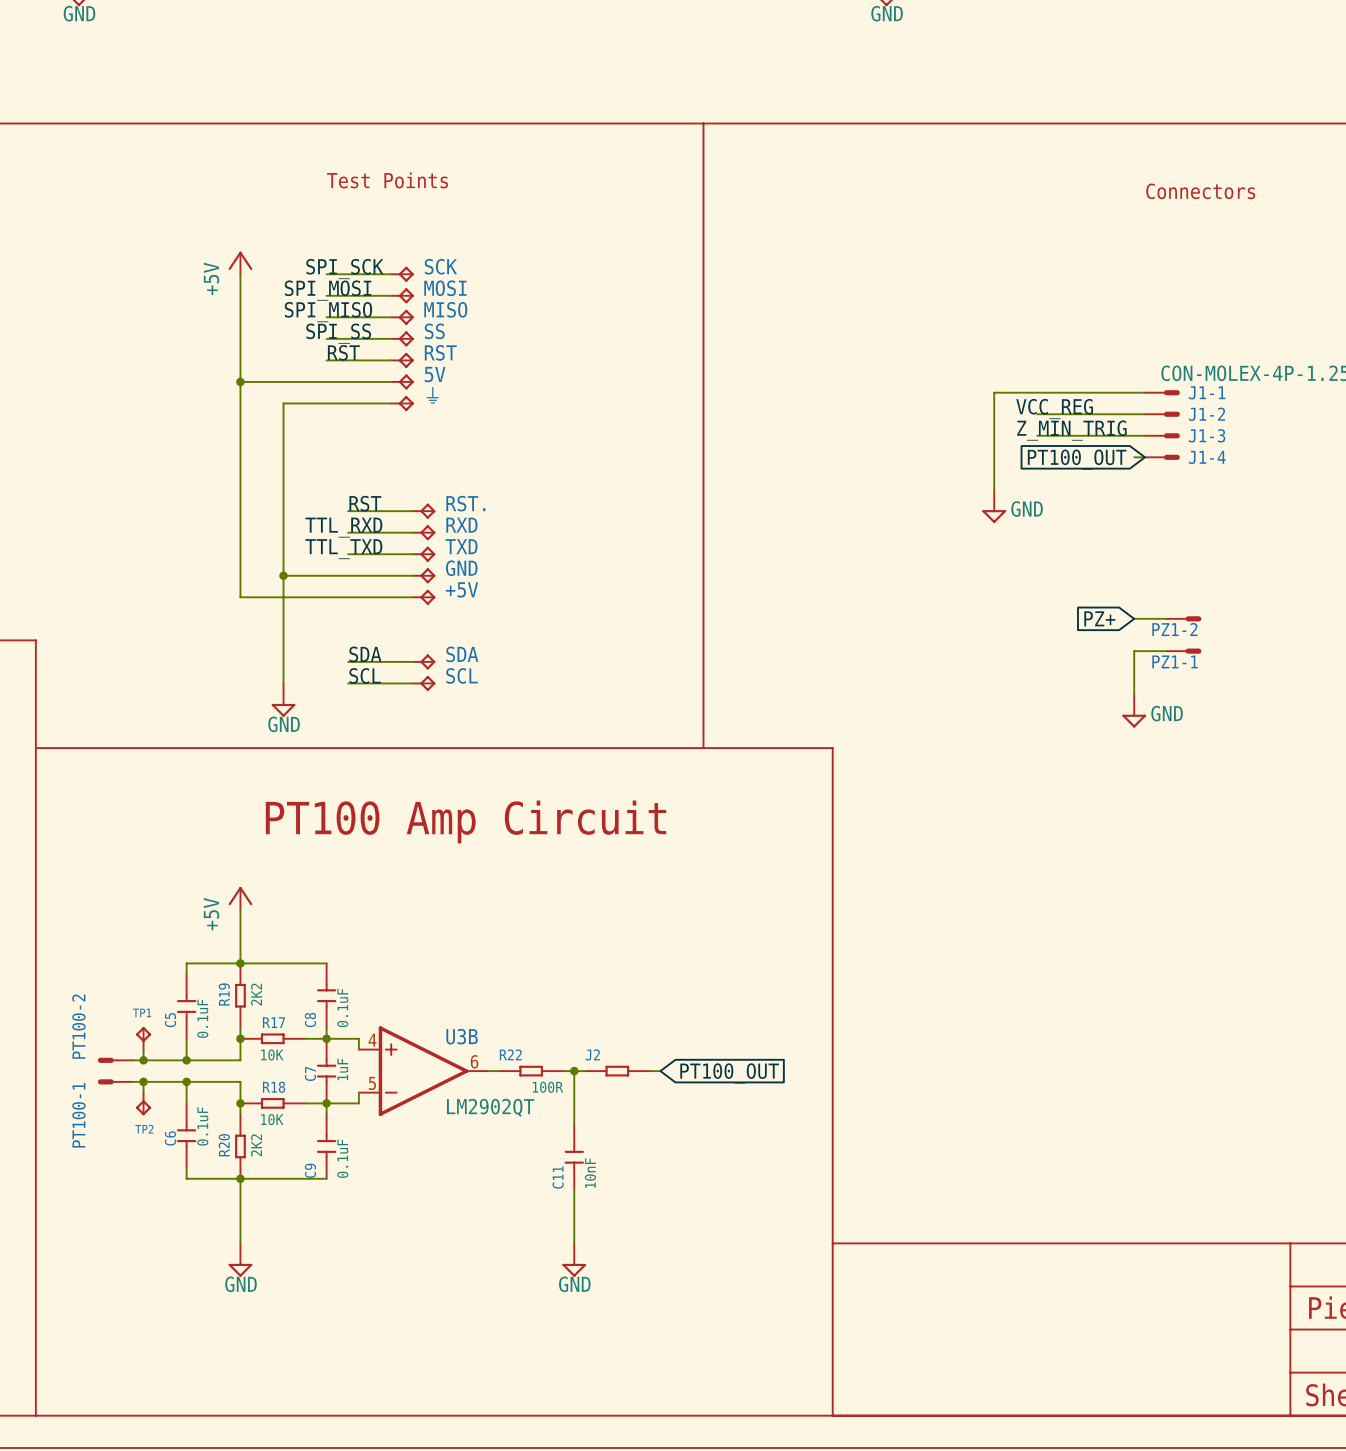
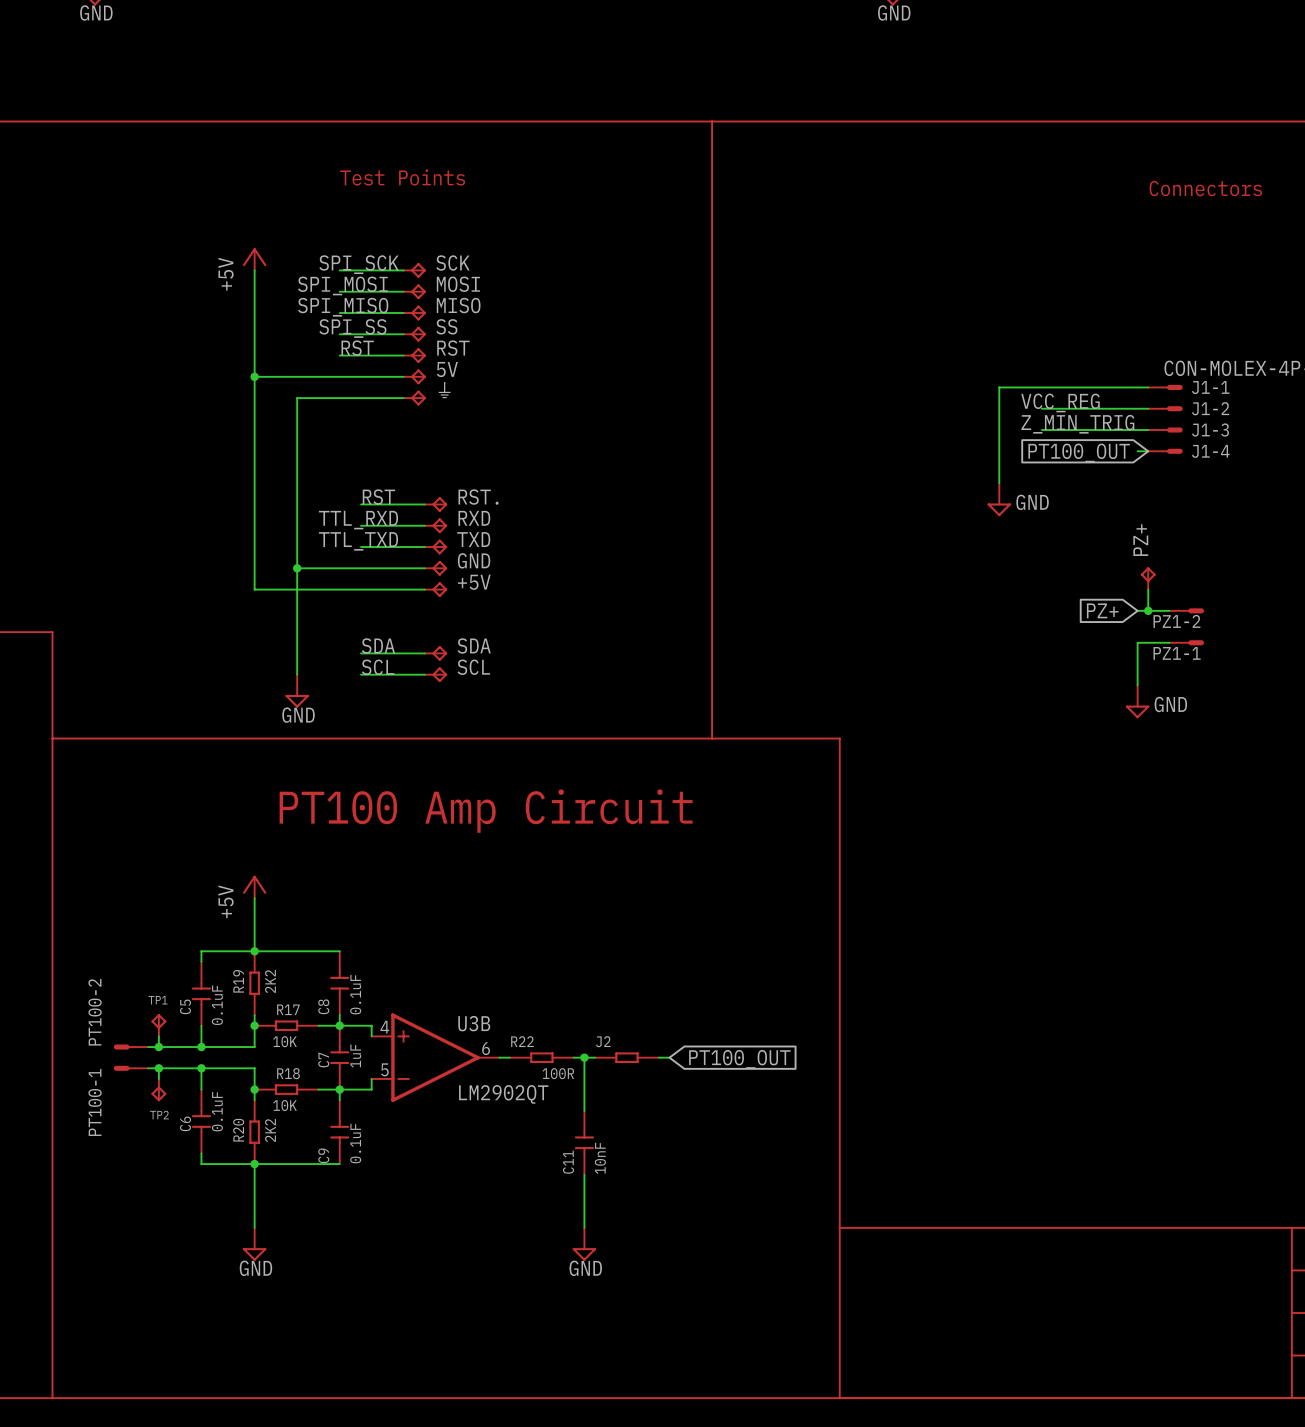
PZ+: none -> (1148, 578)
wire: none -> (1148, 589) (1148, 610)
junction: none -> (1148, 610)

